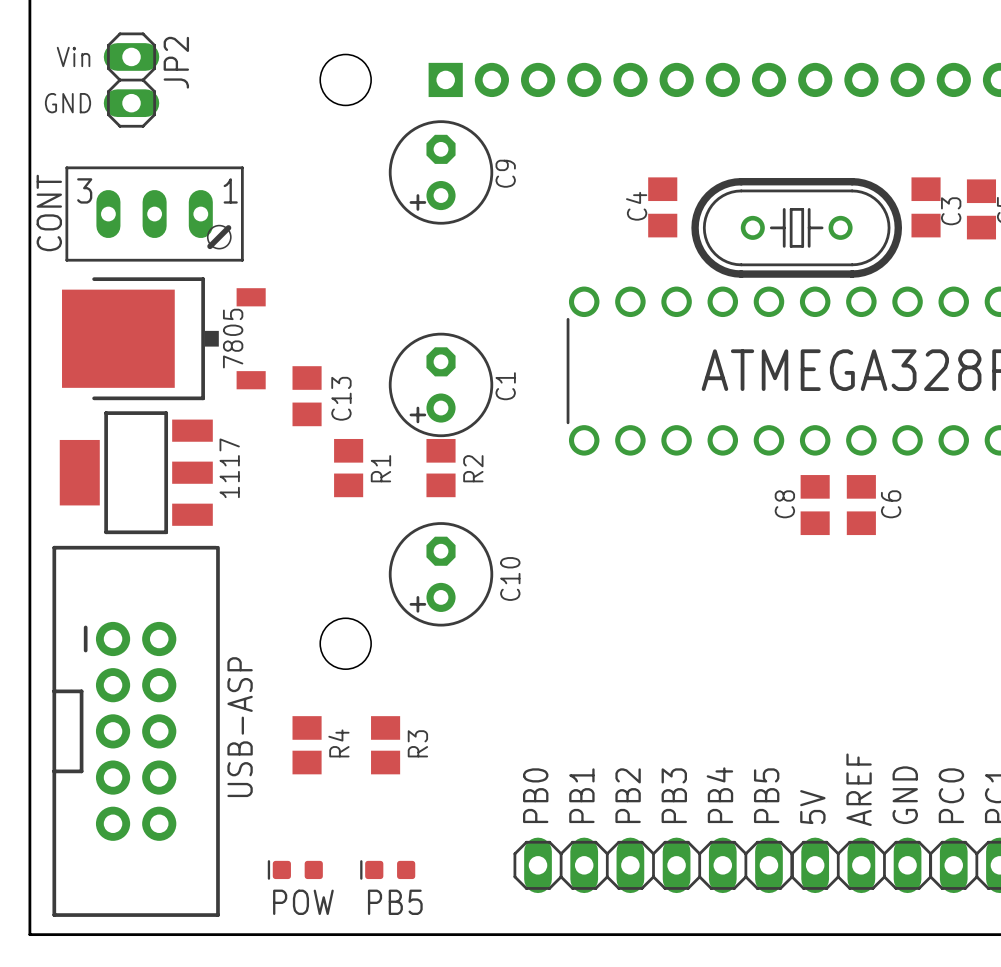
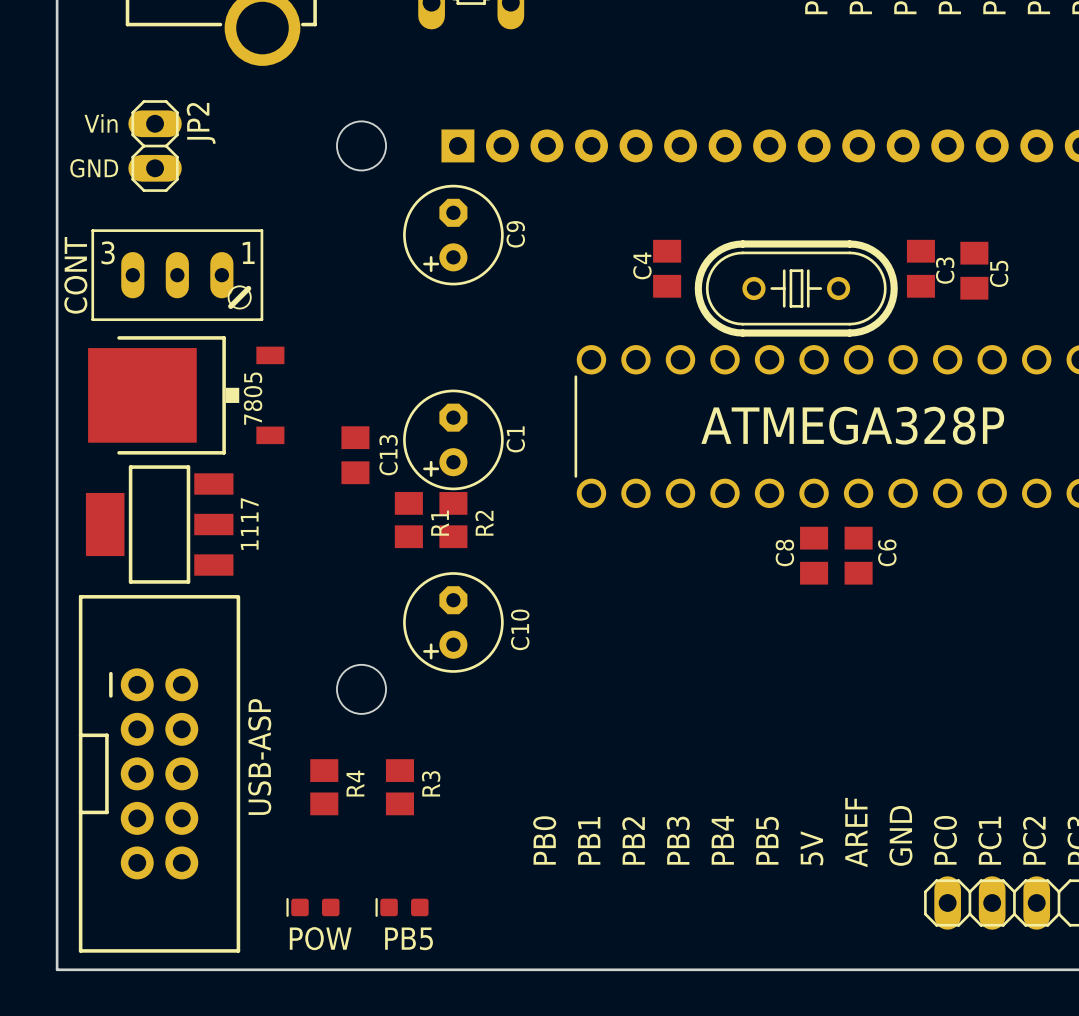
C13 position: (307, 396) -> (355, 455)
R1 position: (348, 468) -> (408, 520)
part: (653, 865) -> none
part: (861, 865) -> none

